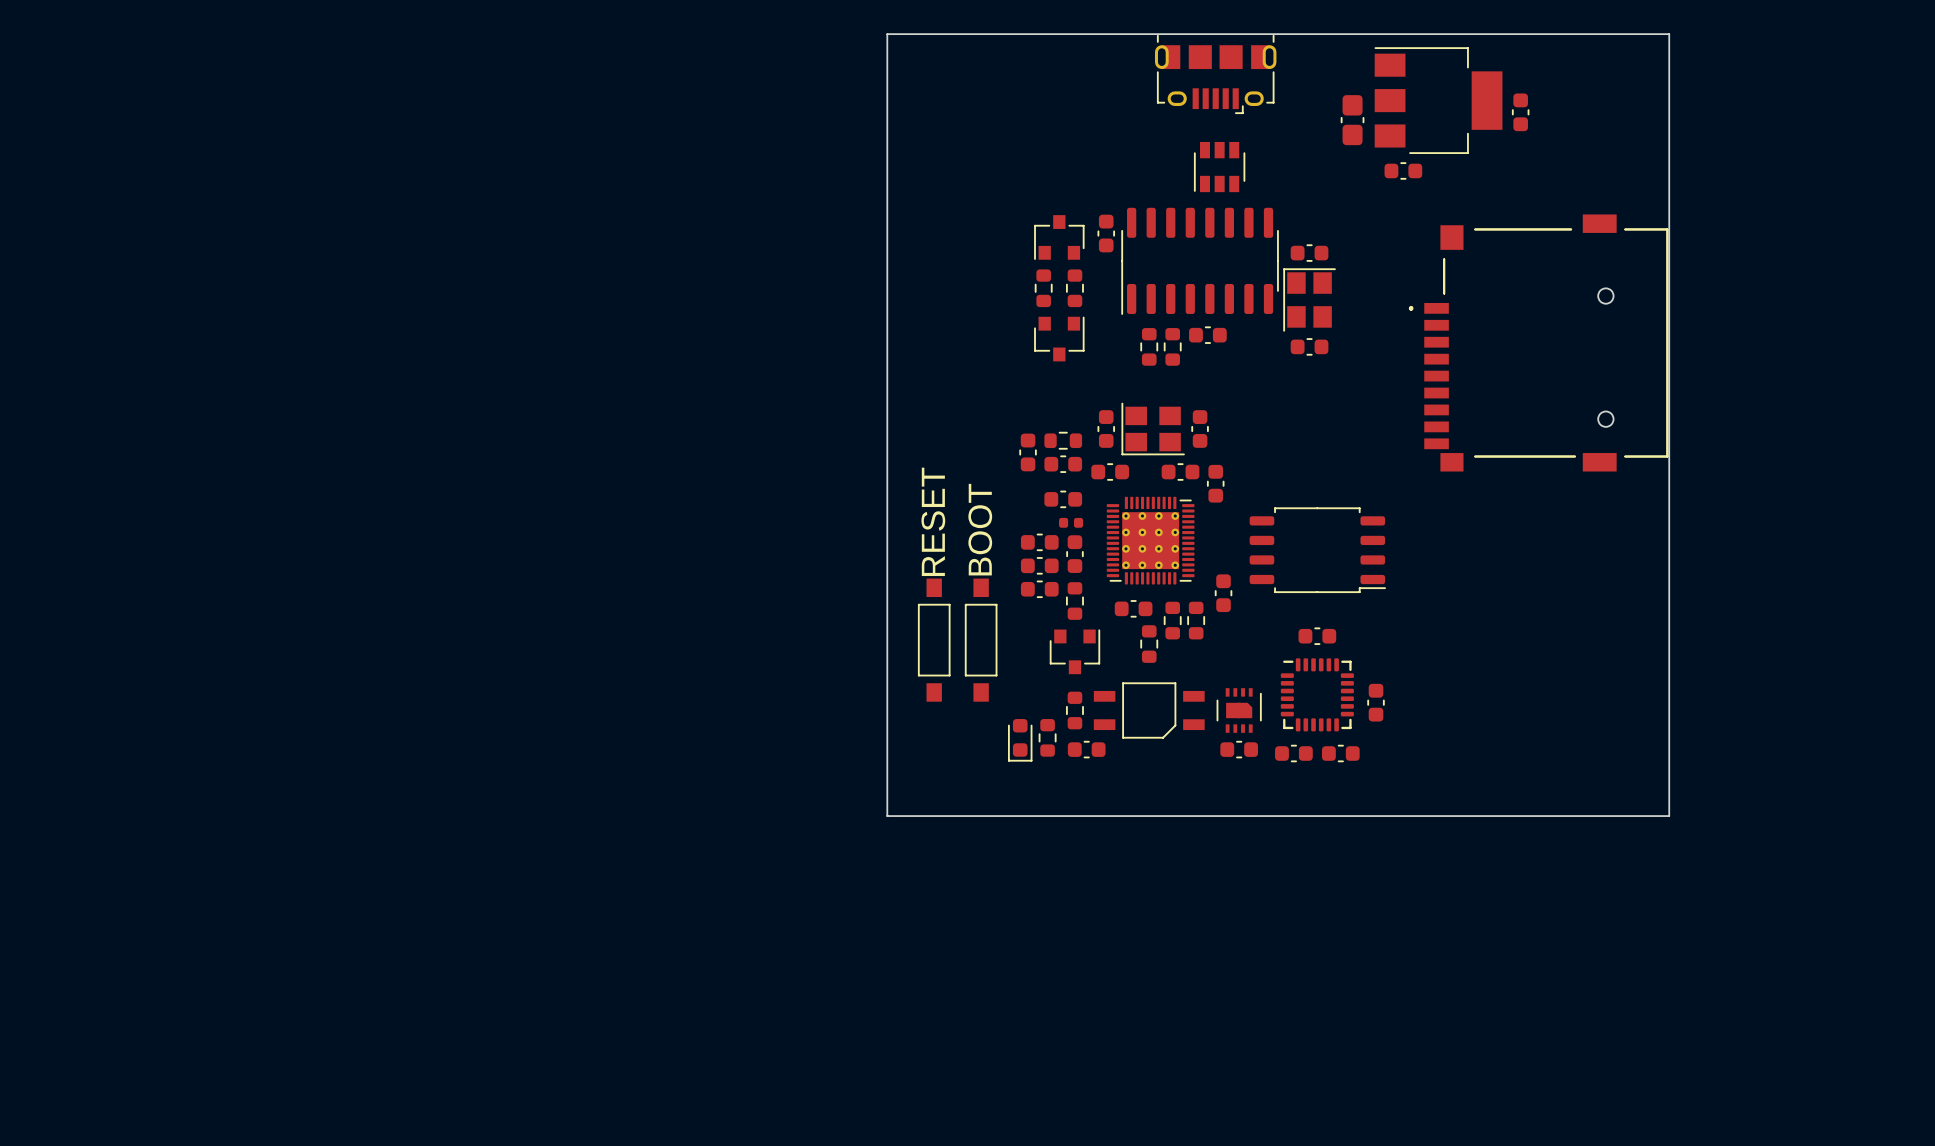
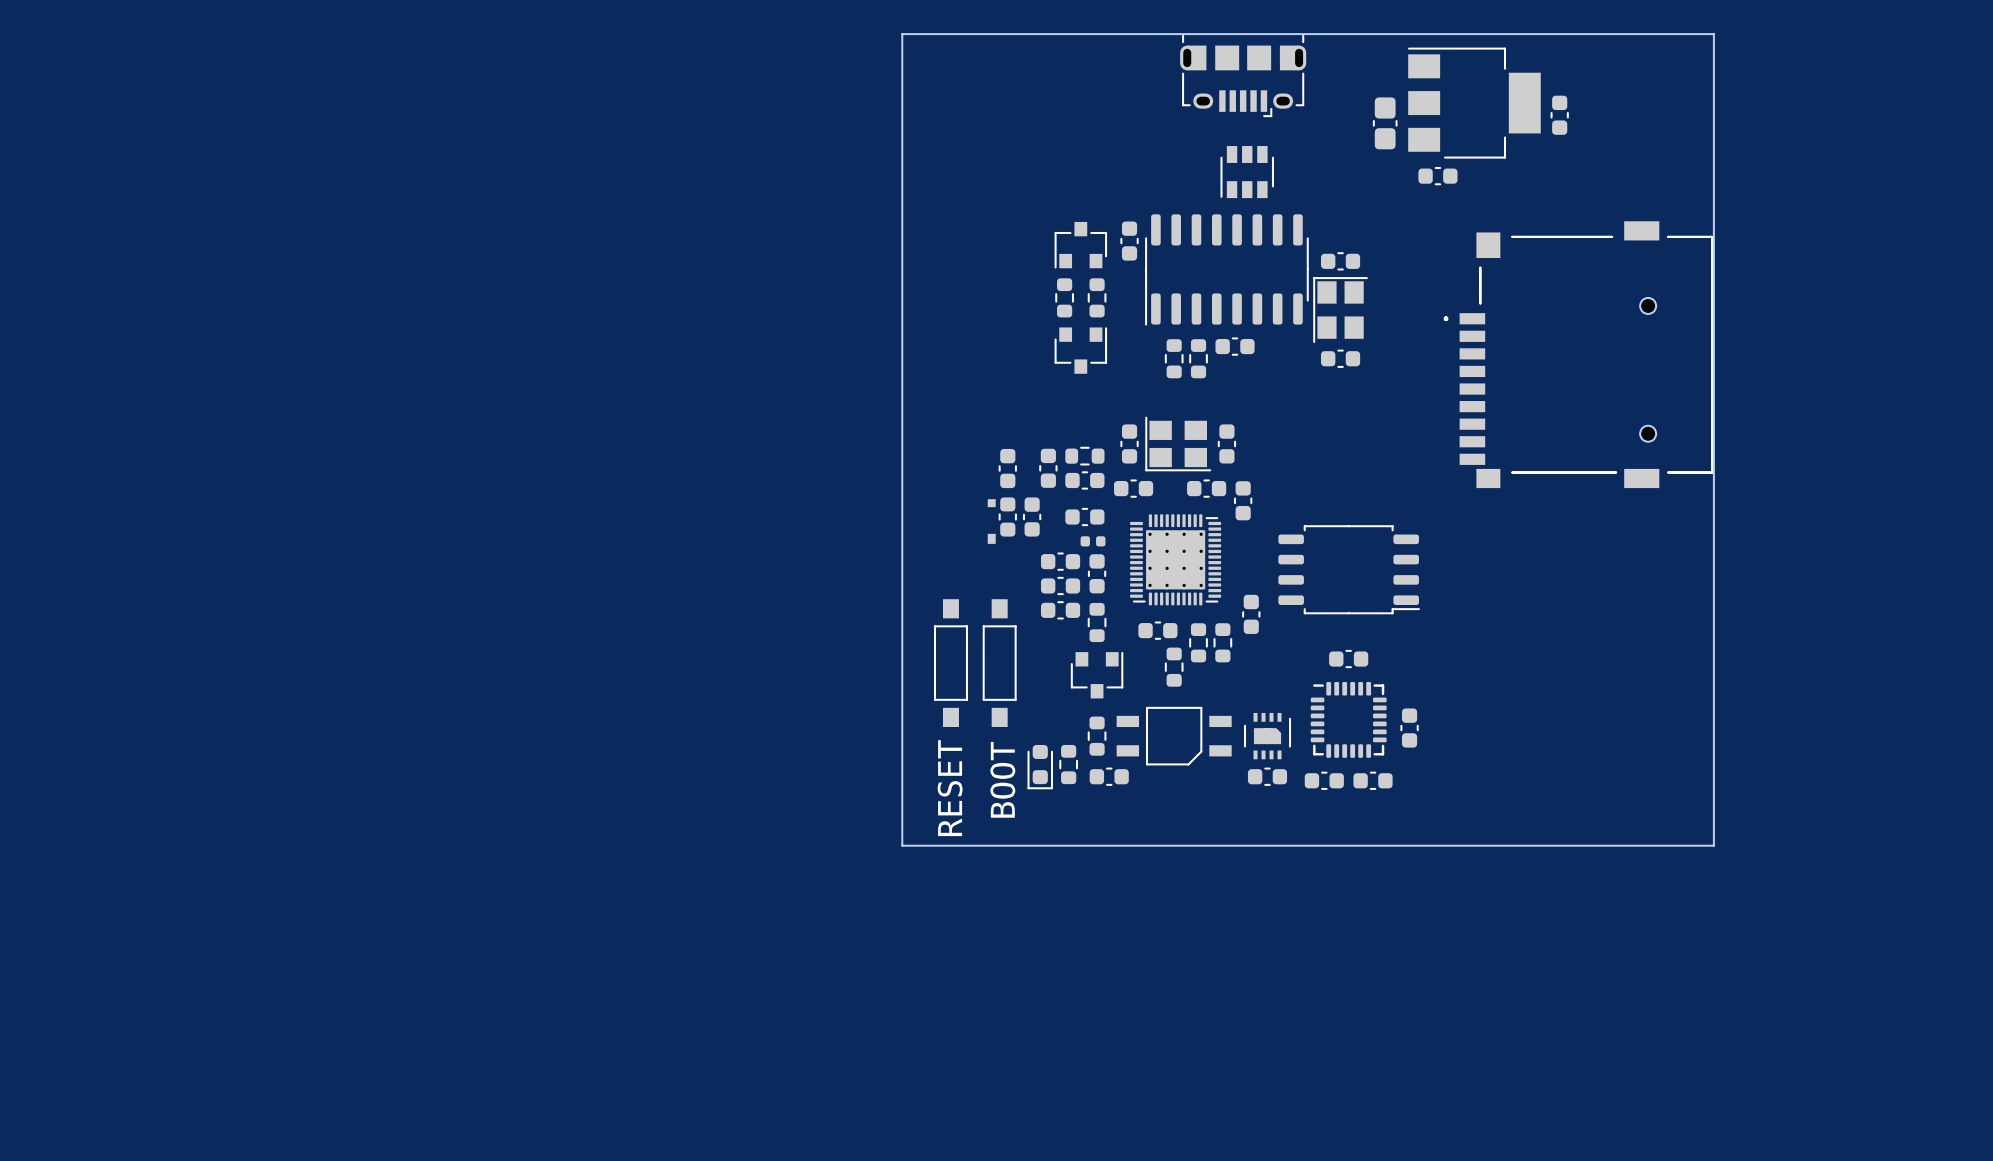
part: none -> (1007, 468)
part: none -> (1007, 517)
part: none -> (1032, 517)
part: none -> (991, 521)
text position: RESET (933, 521) -> RESET (950, 788)
text position: BOOT (980, 529) -> BOOT (1002, 779)

